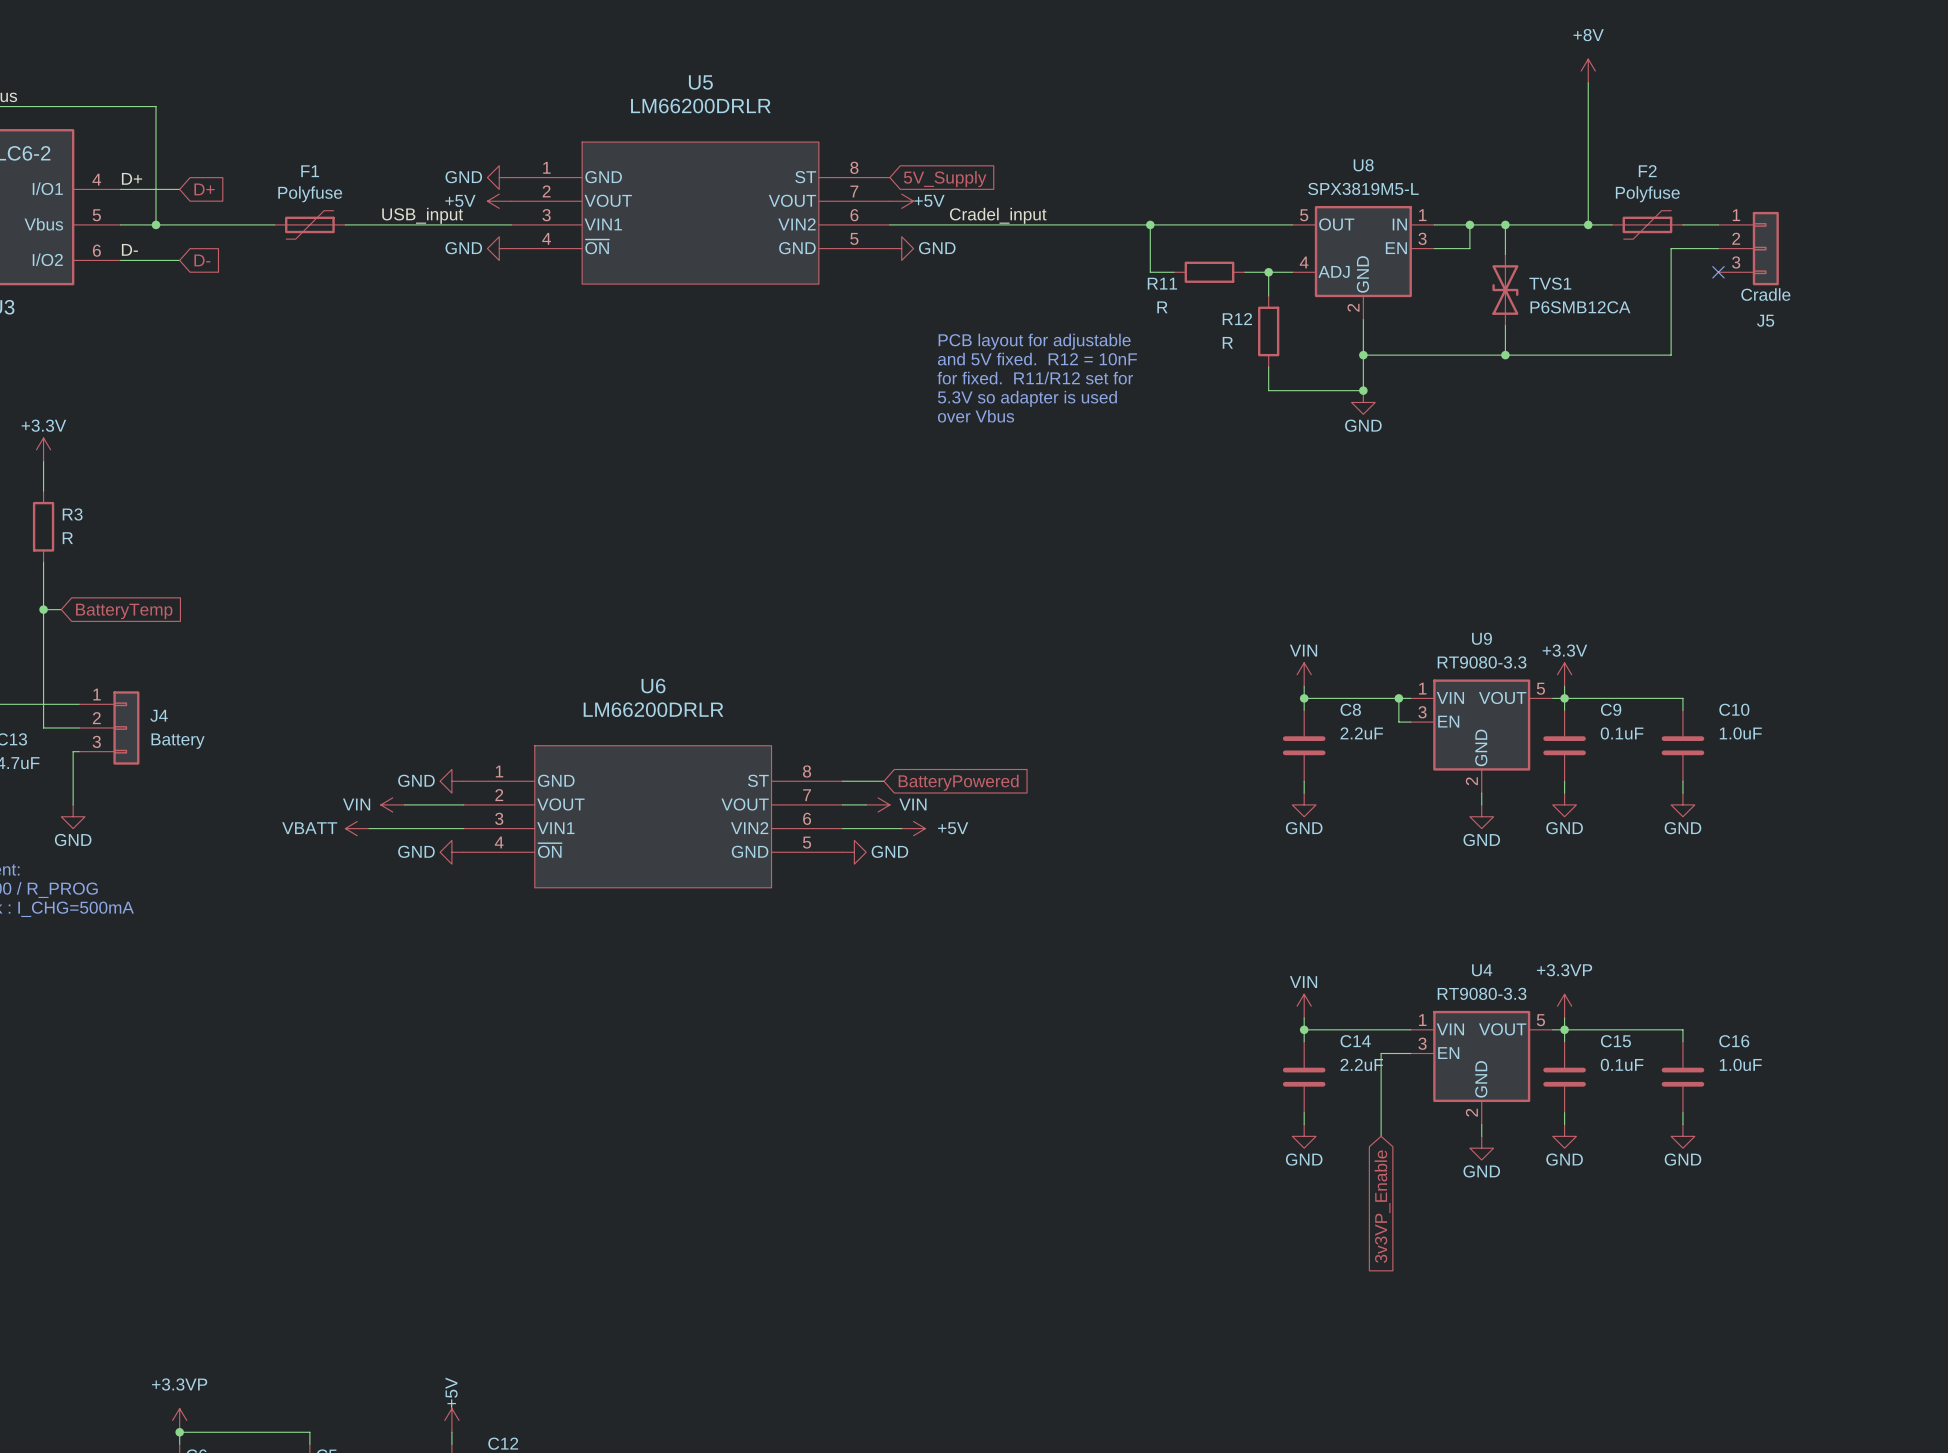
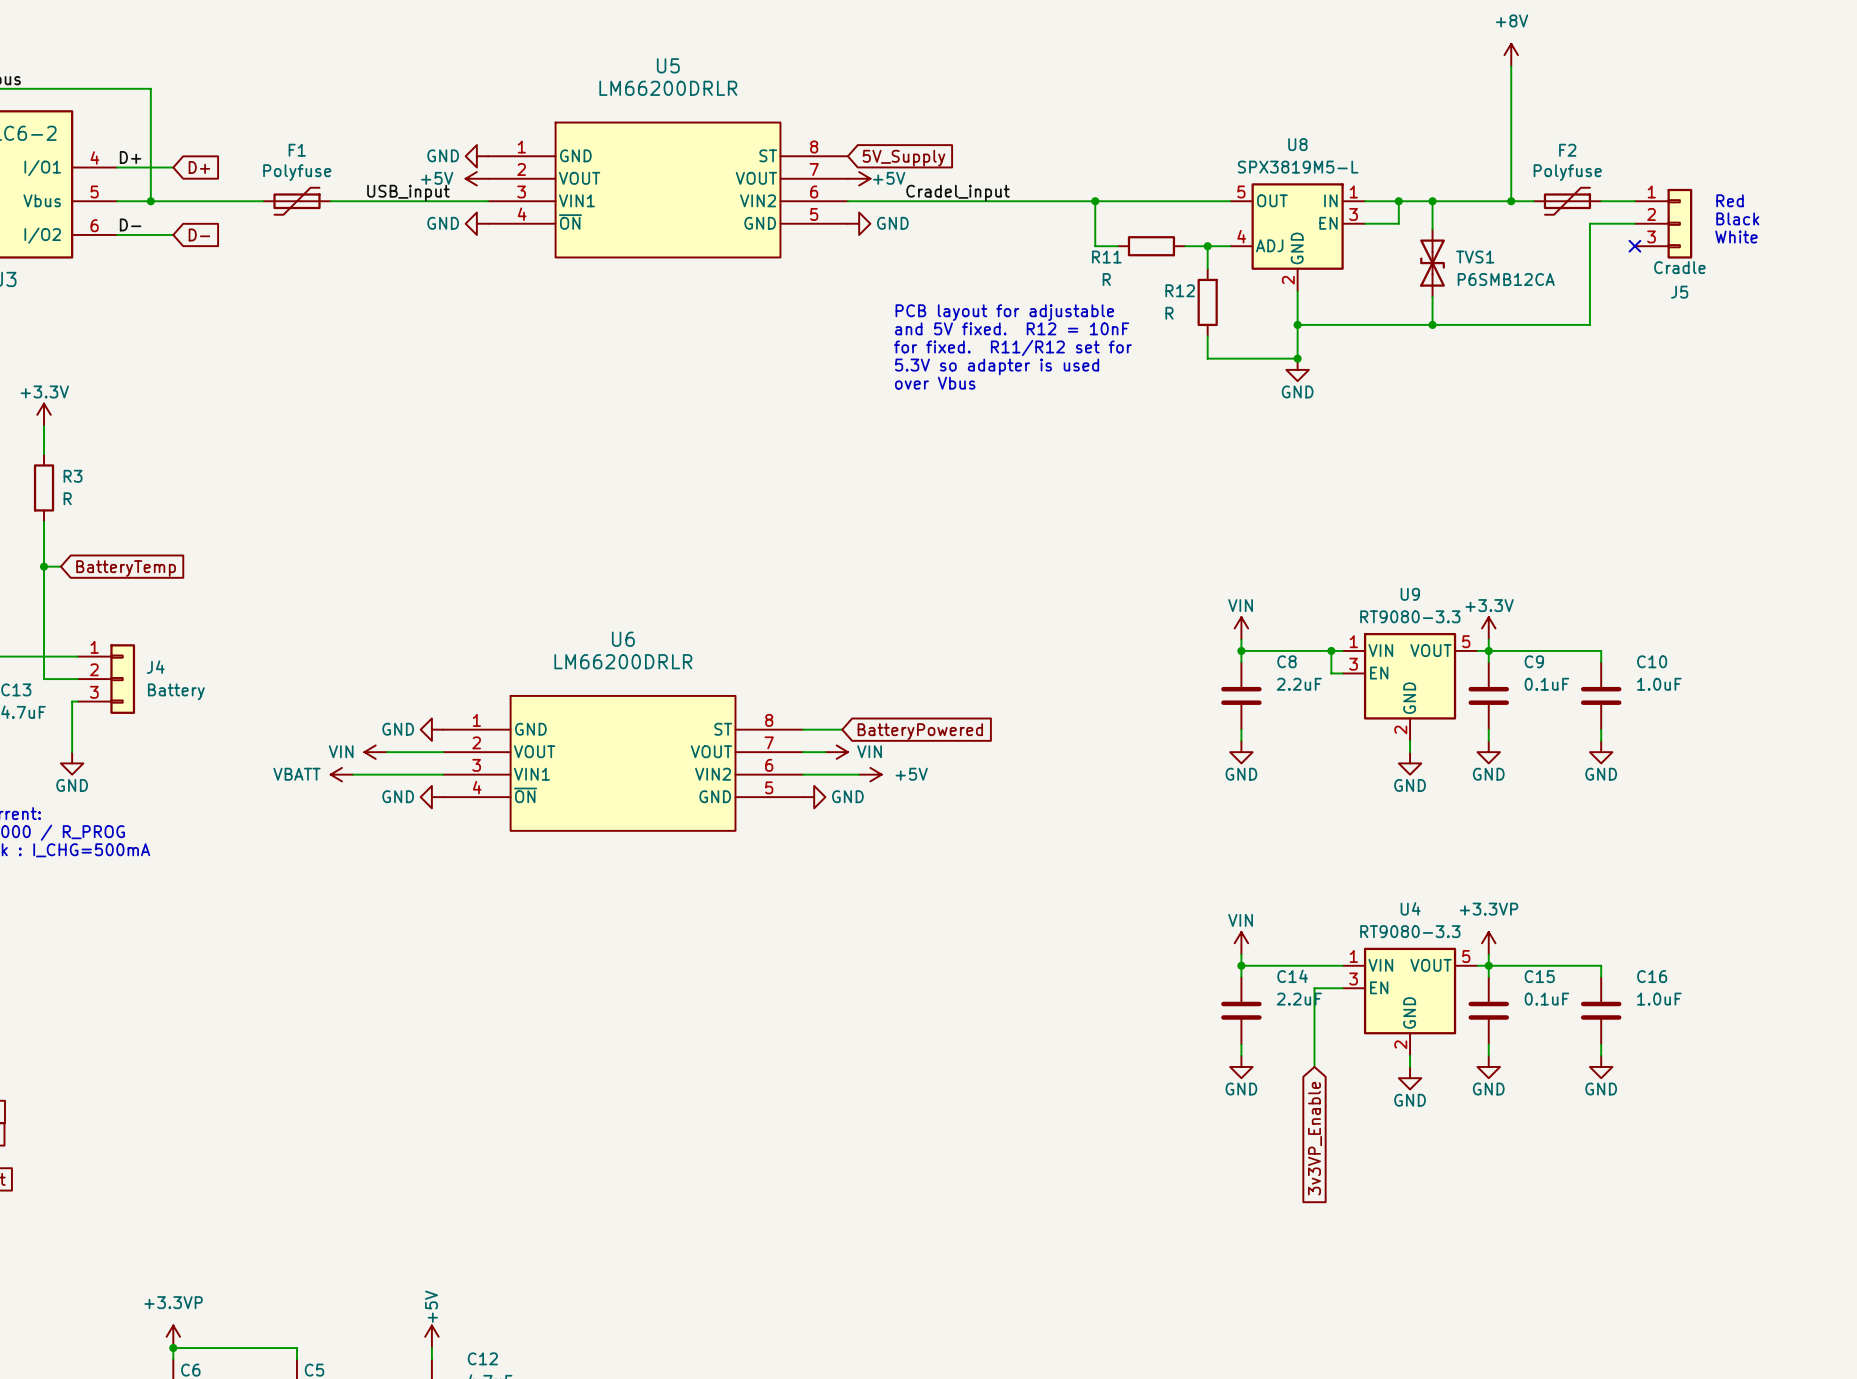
text: none -> Red (1730, 200)
text: none -> Black (1737, 218)
text: none -> White (1736, 237)

